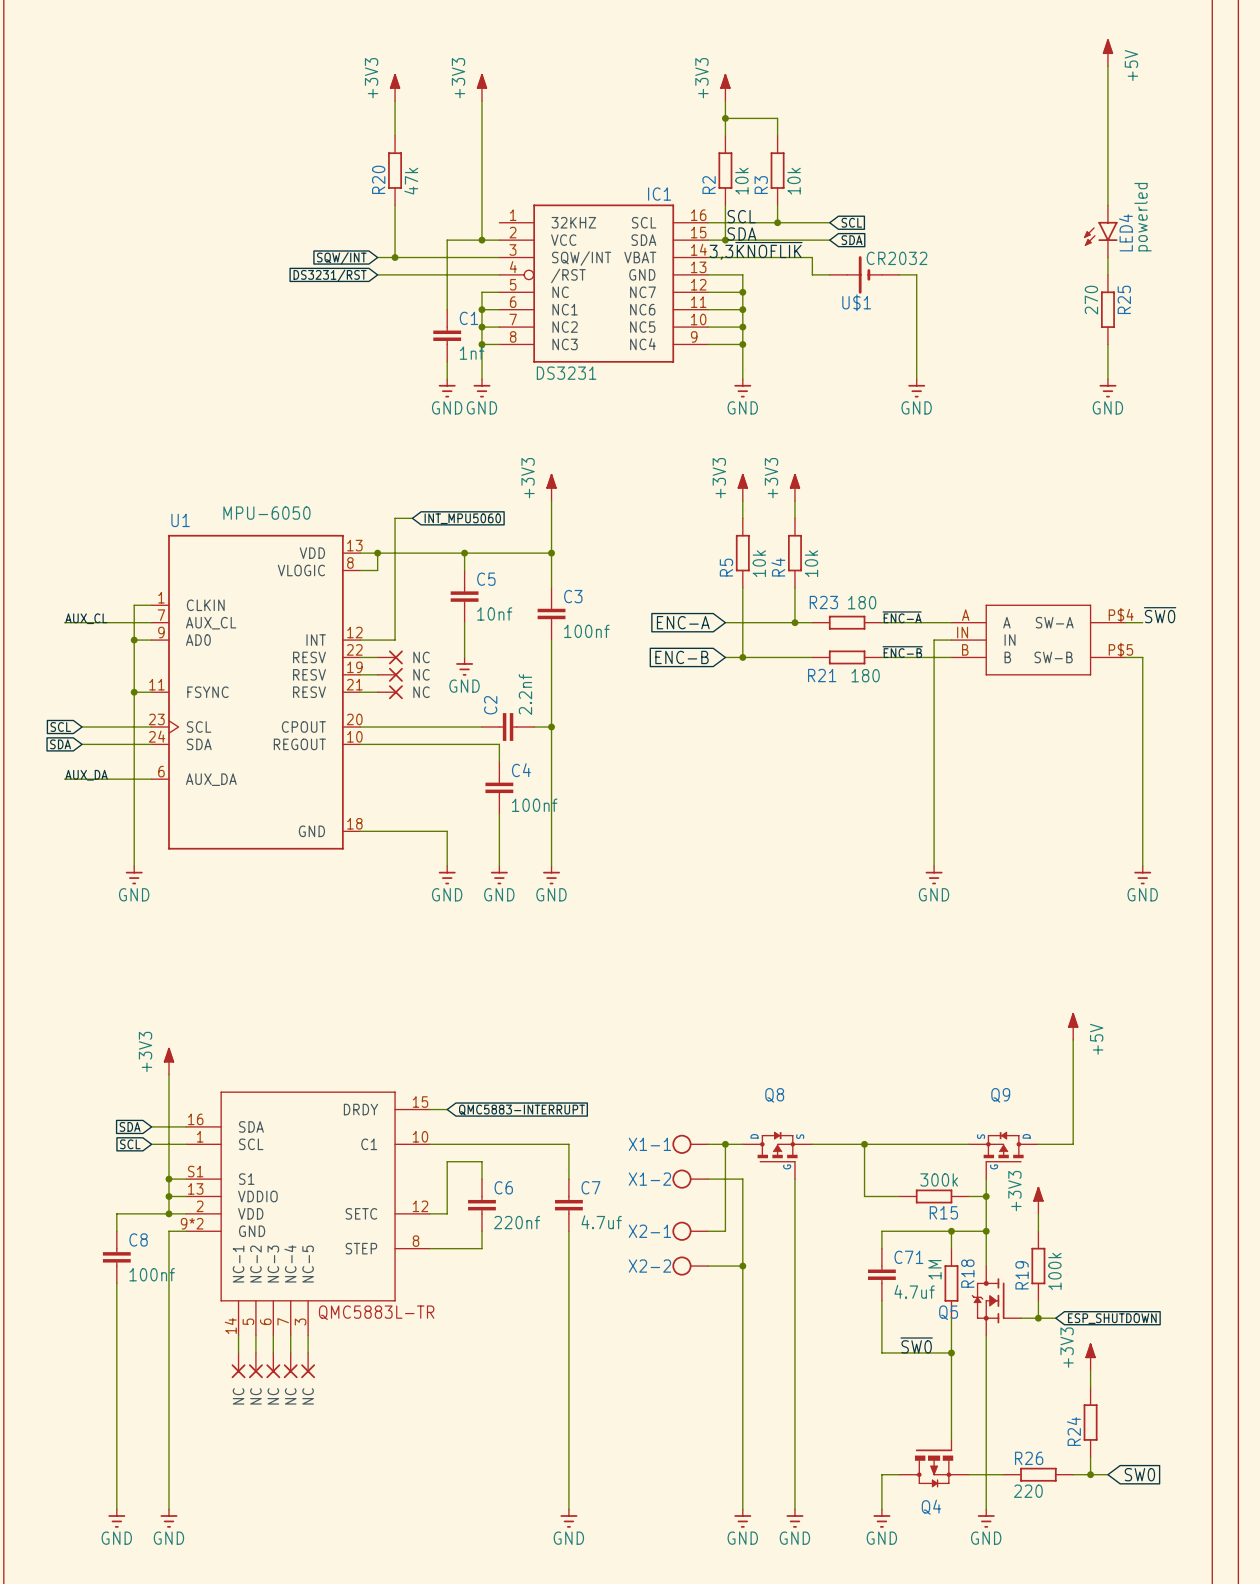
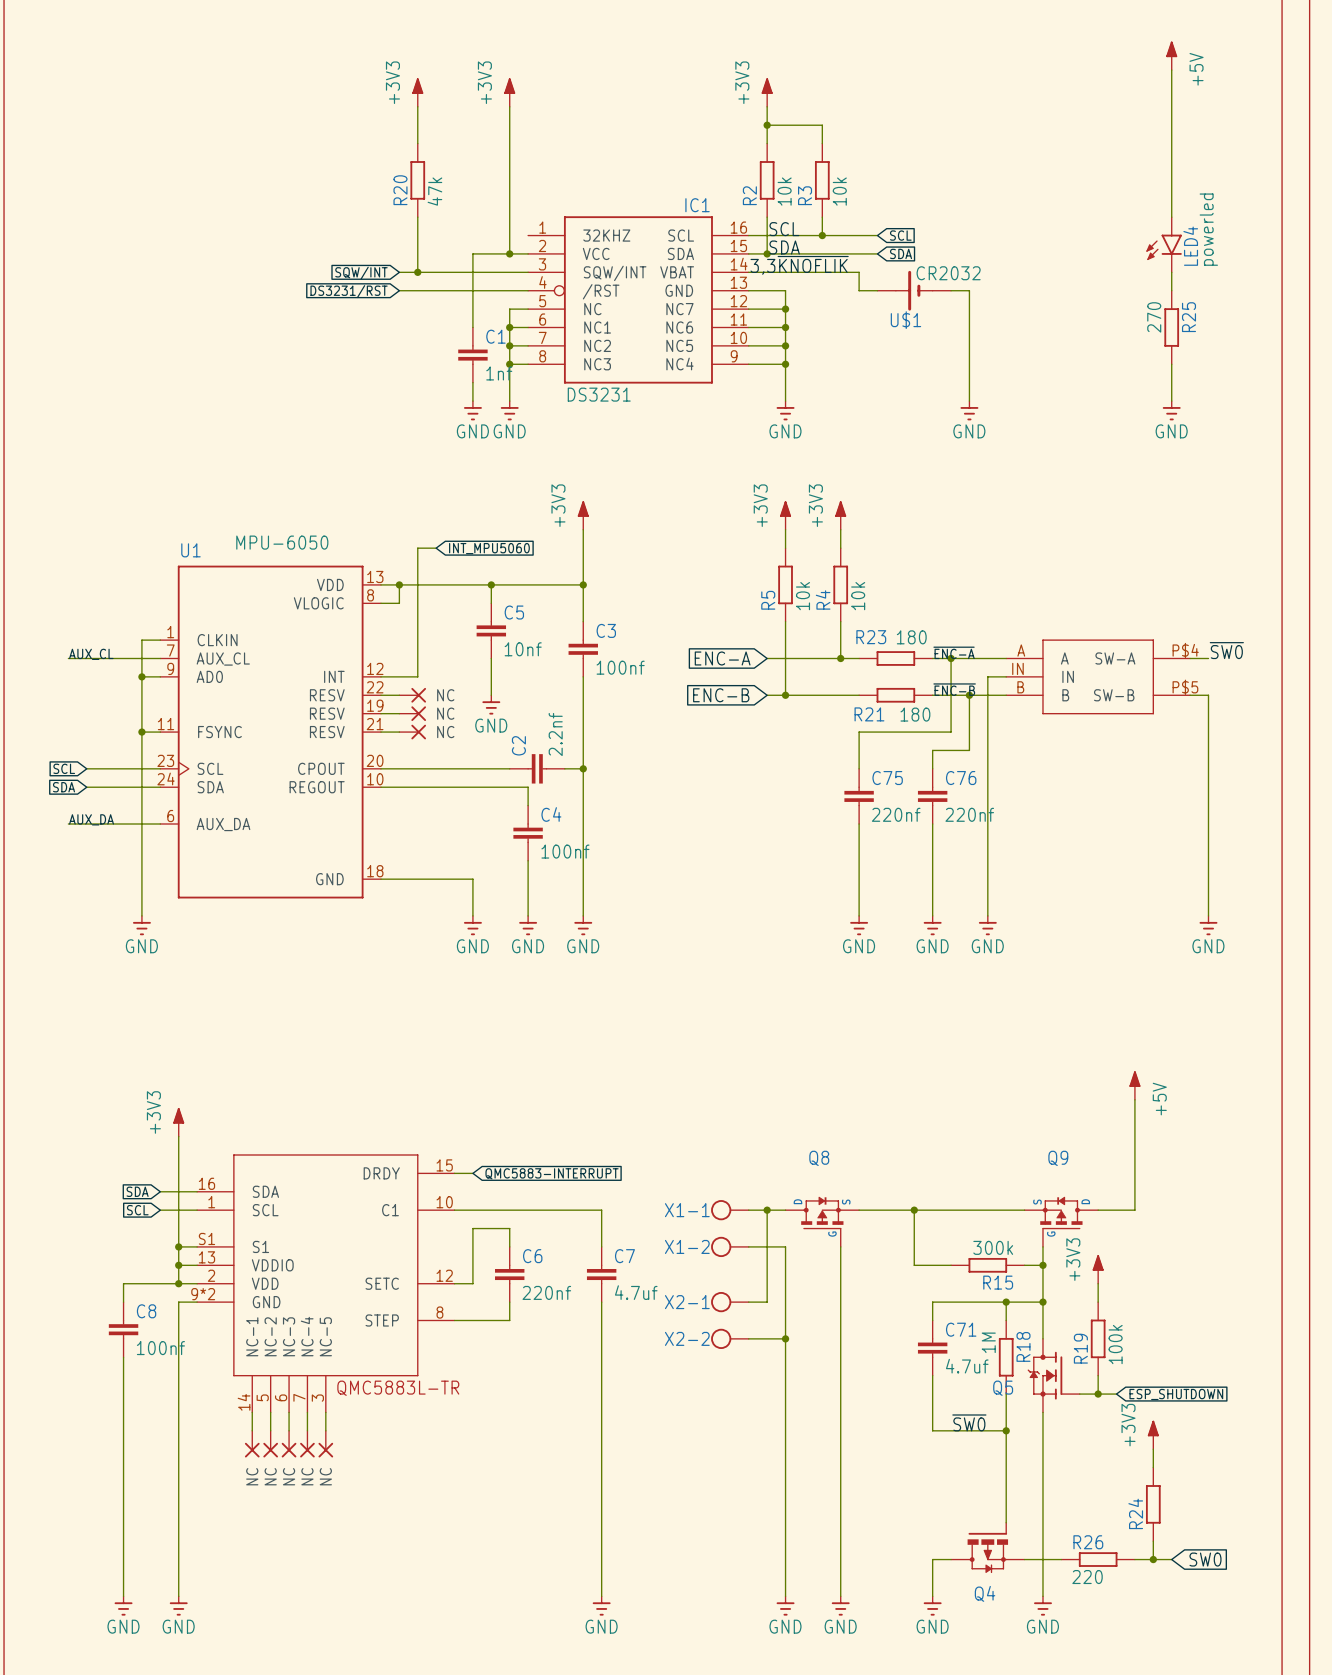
wire: none -> (951, 658) (951, 732) (859, 732) (859, 768)
junction: none -> (951, 658)
wire: none -> (969, 695) (969, 750) (932, 750) (932, 768)
junction: none -> (969, 695)
C75: none -> 220nf (859, 796)
C76: none -> 220nf (932, 796)
wire: none -> (859, 824) (859, 915)
wire: none -> (932, 824) (932, 915)
power symbol: none -> GND (859, 925)
power symbol: none -> GND (932, 925)

